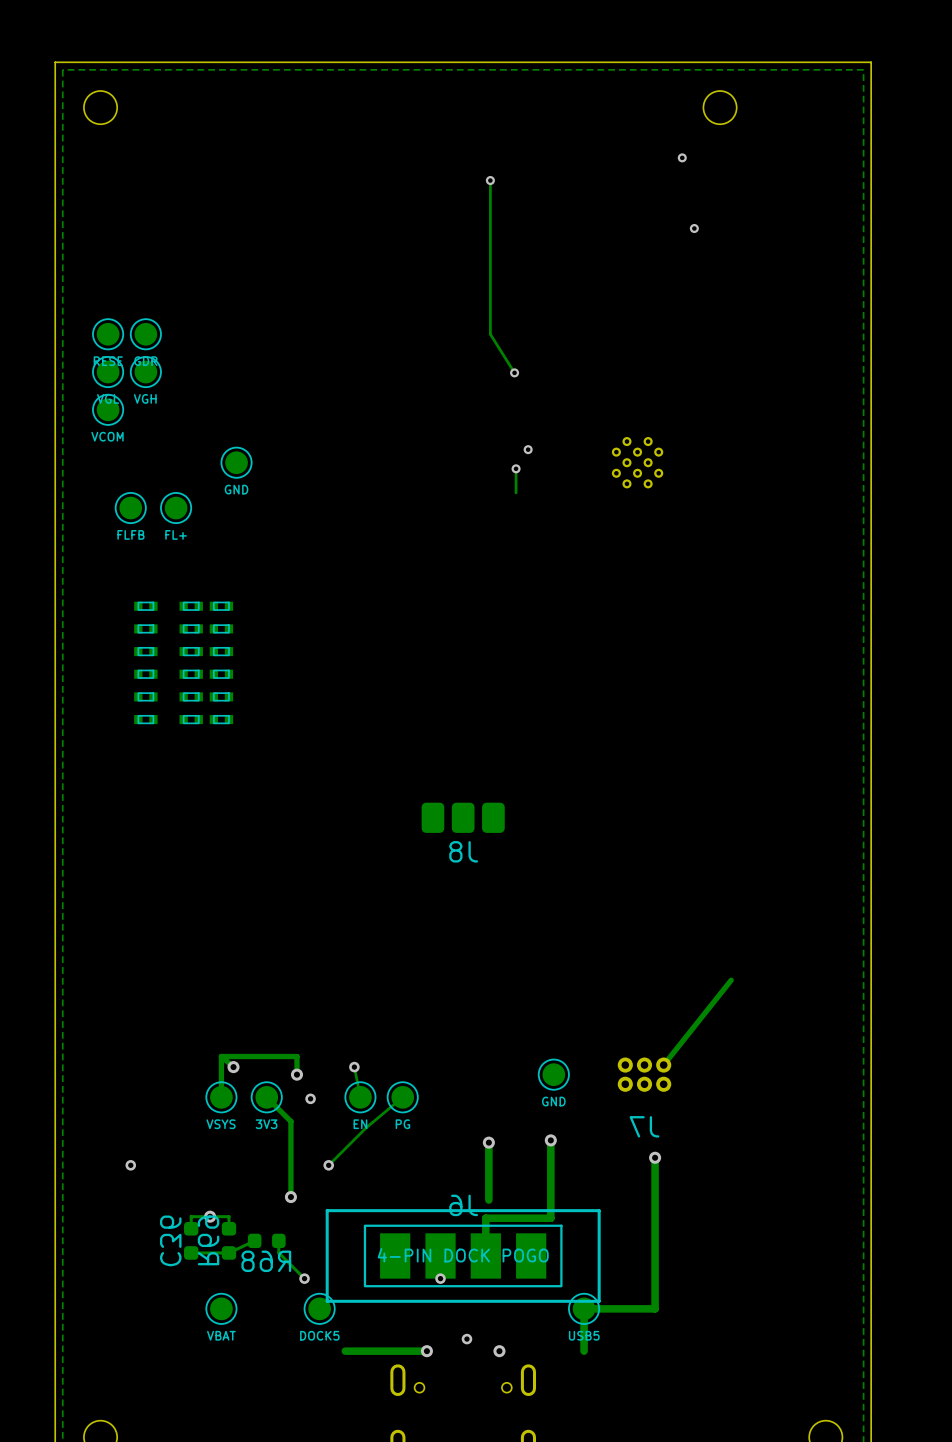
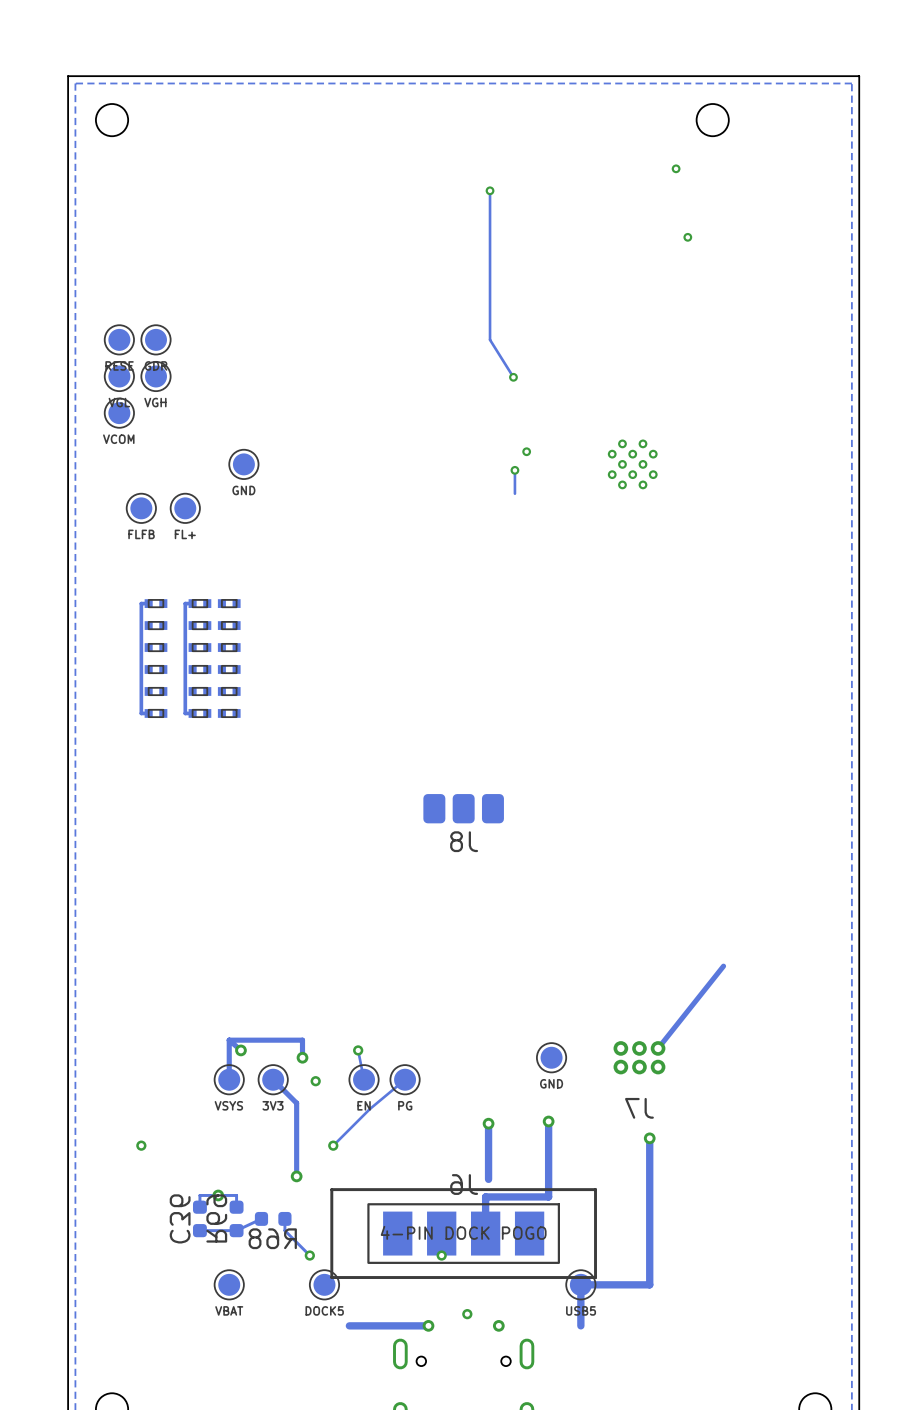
track: none -> (148, 603) (141, 603) (141, 713) (148, 713)
track: none -> (192, 603) (185, 603) (185, 713) (192, 713)

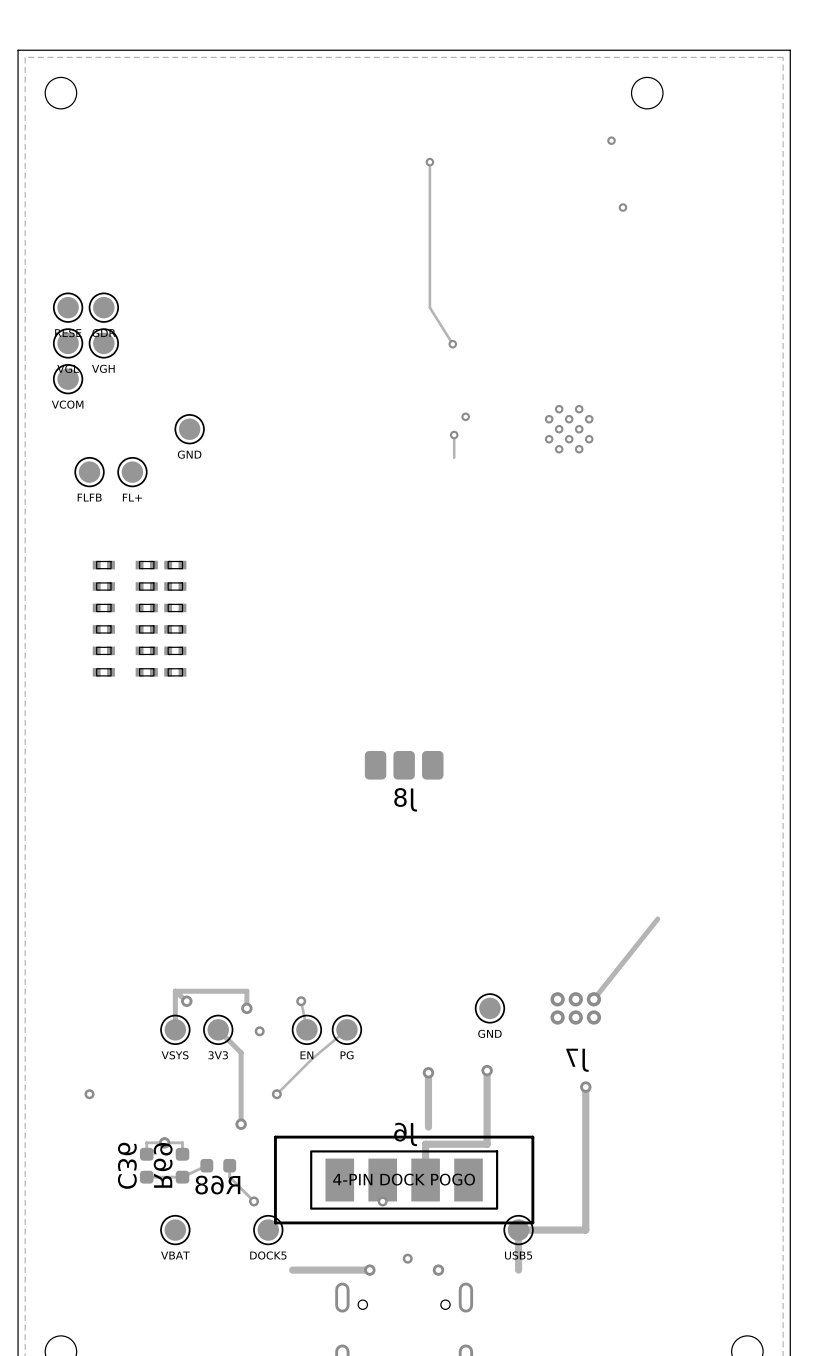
track: (148, 603) (141, 603) (141, 713) (148, 713) -> none
track: (192, 603) (185, 603) (185, 713) (192, 713) -> none

